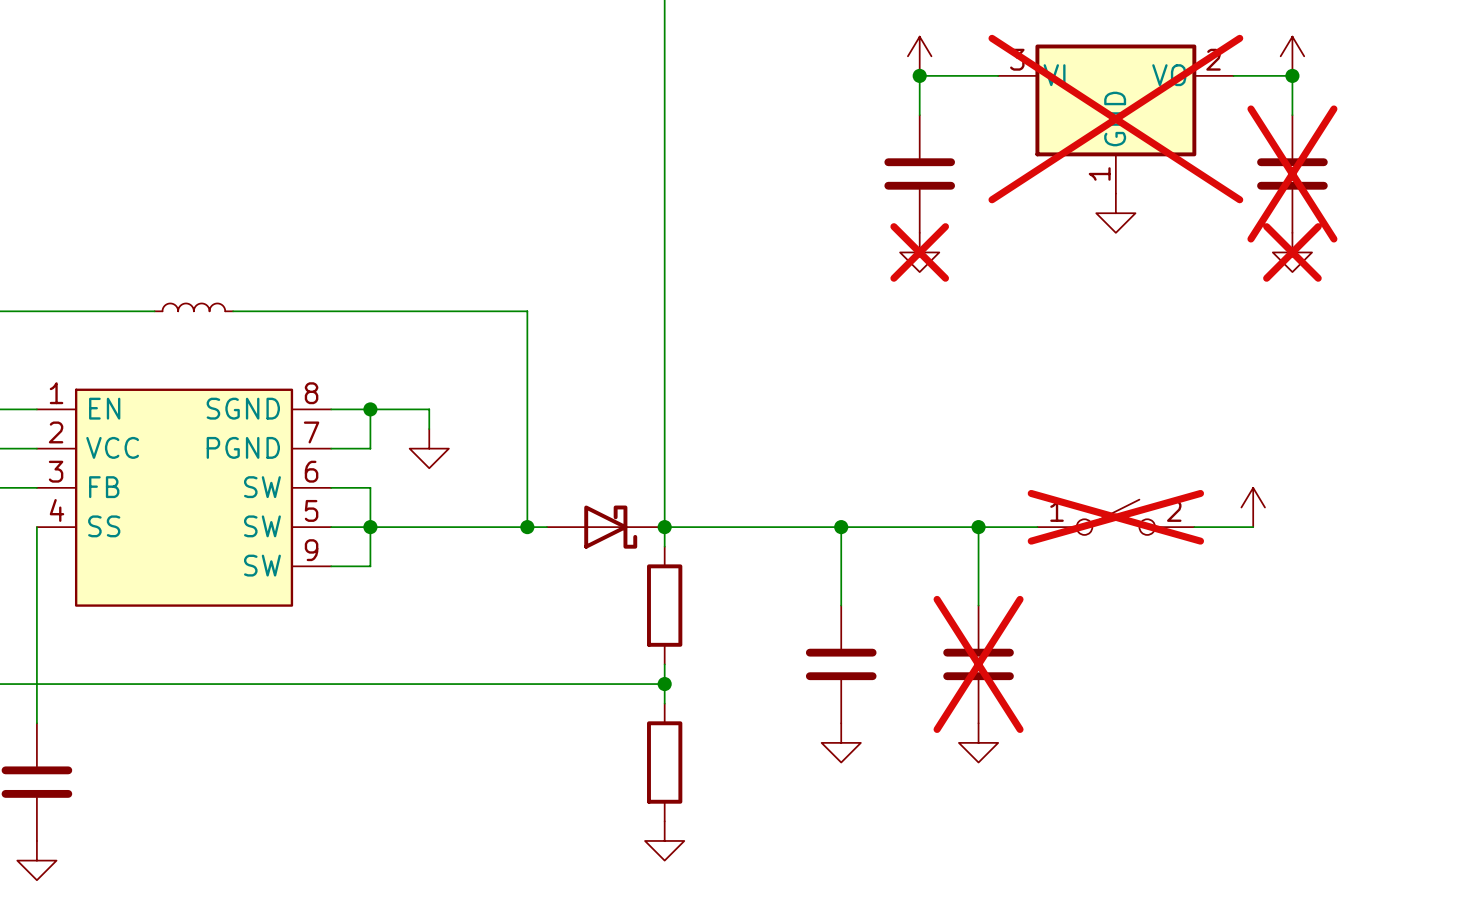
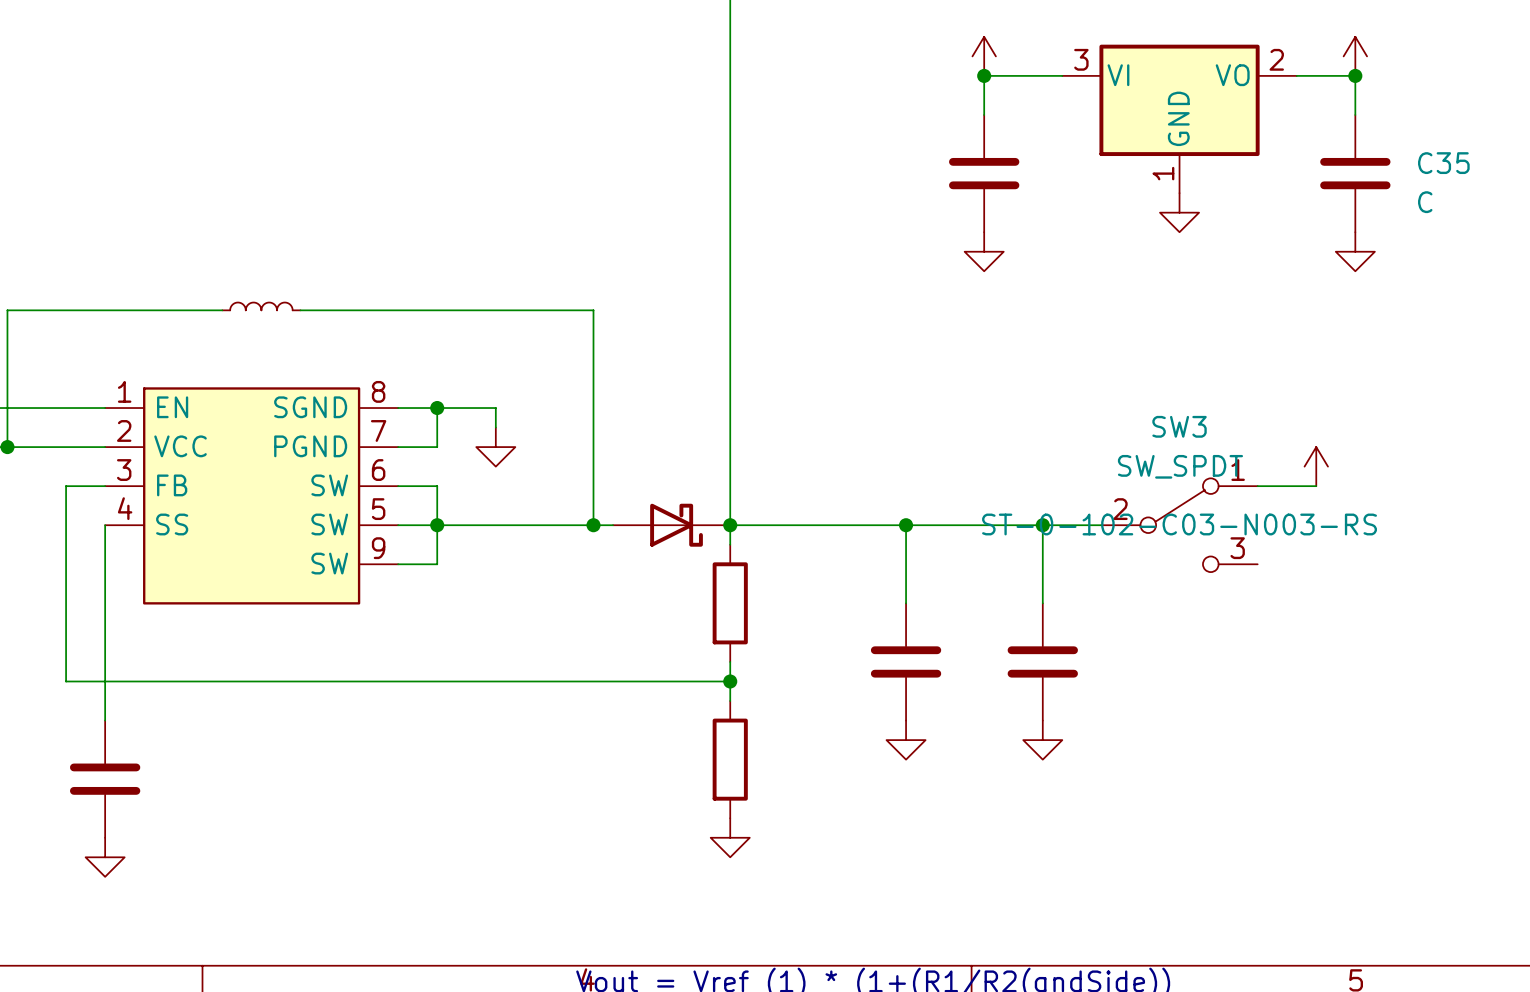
part do-not-place cross: (1115, 119) -> none
C35 name: none -> C35 (1443, 163)
C35 do-not-place cross: (1292, 173) -> none
C35 value: none -> C (1425, 202)
power symbol do-not-place cross: (919, 252) -> none
power symbol do-not-place cross: (1292, 252) -> none
power symbol position: (1253, 507) -> (1316, 466)
part: (1115, 517) -> none
SW3: none -> SW_SPDT (1179, 525)
wire: (1194, 527) (1253, 527) -> (1257, 486) (1316, 486)
part do-not-place cross: (978, 664) -> none

